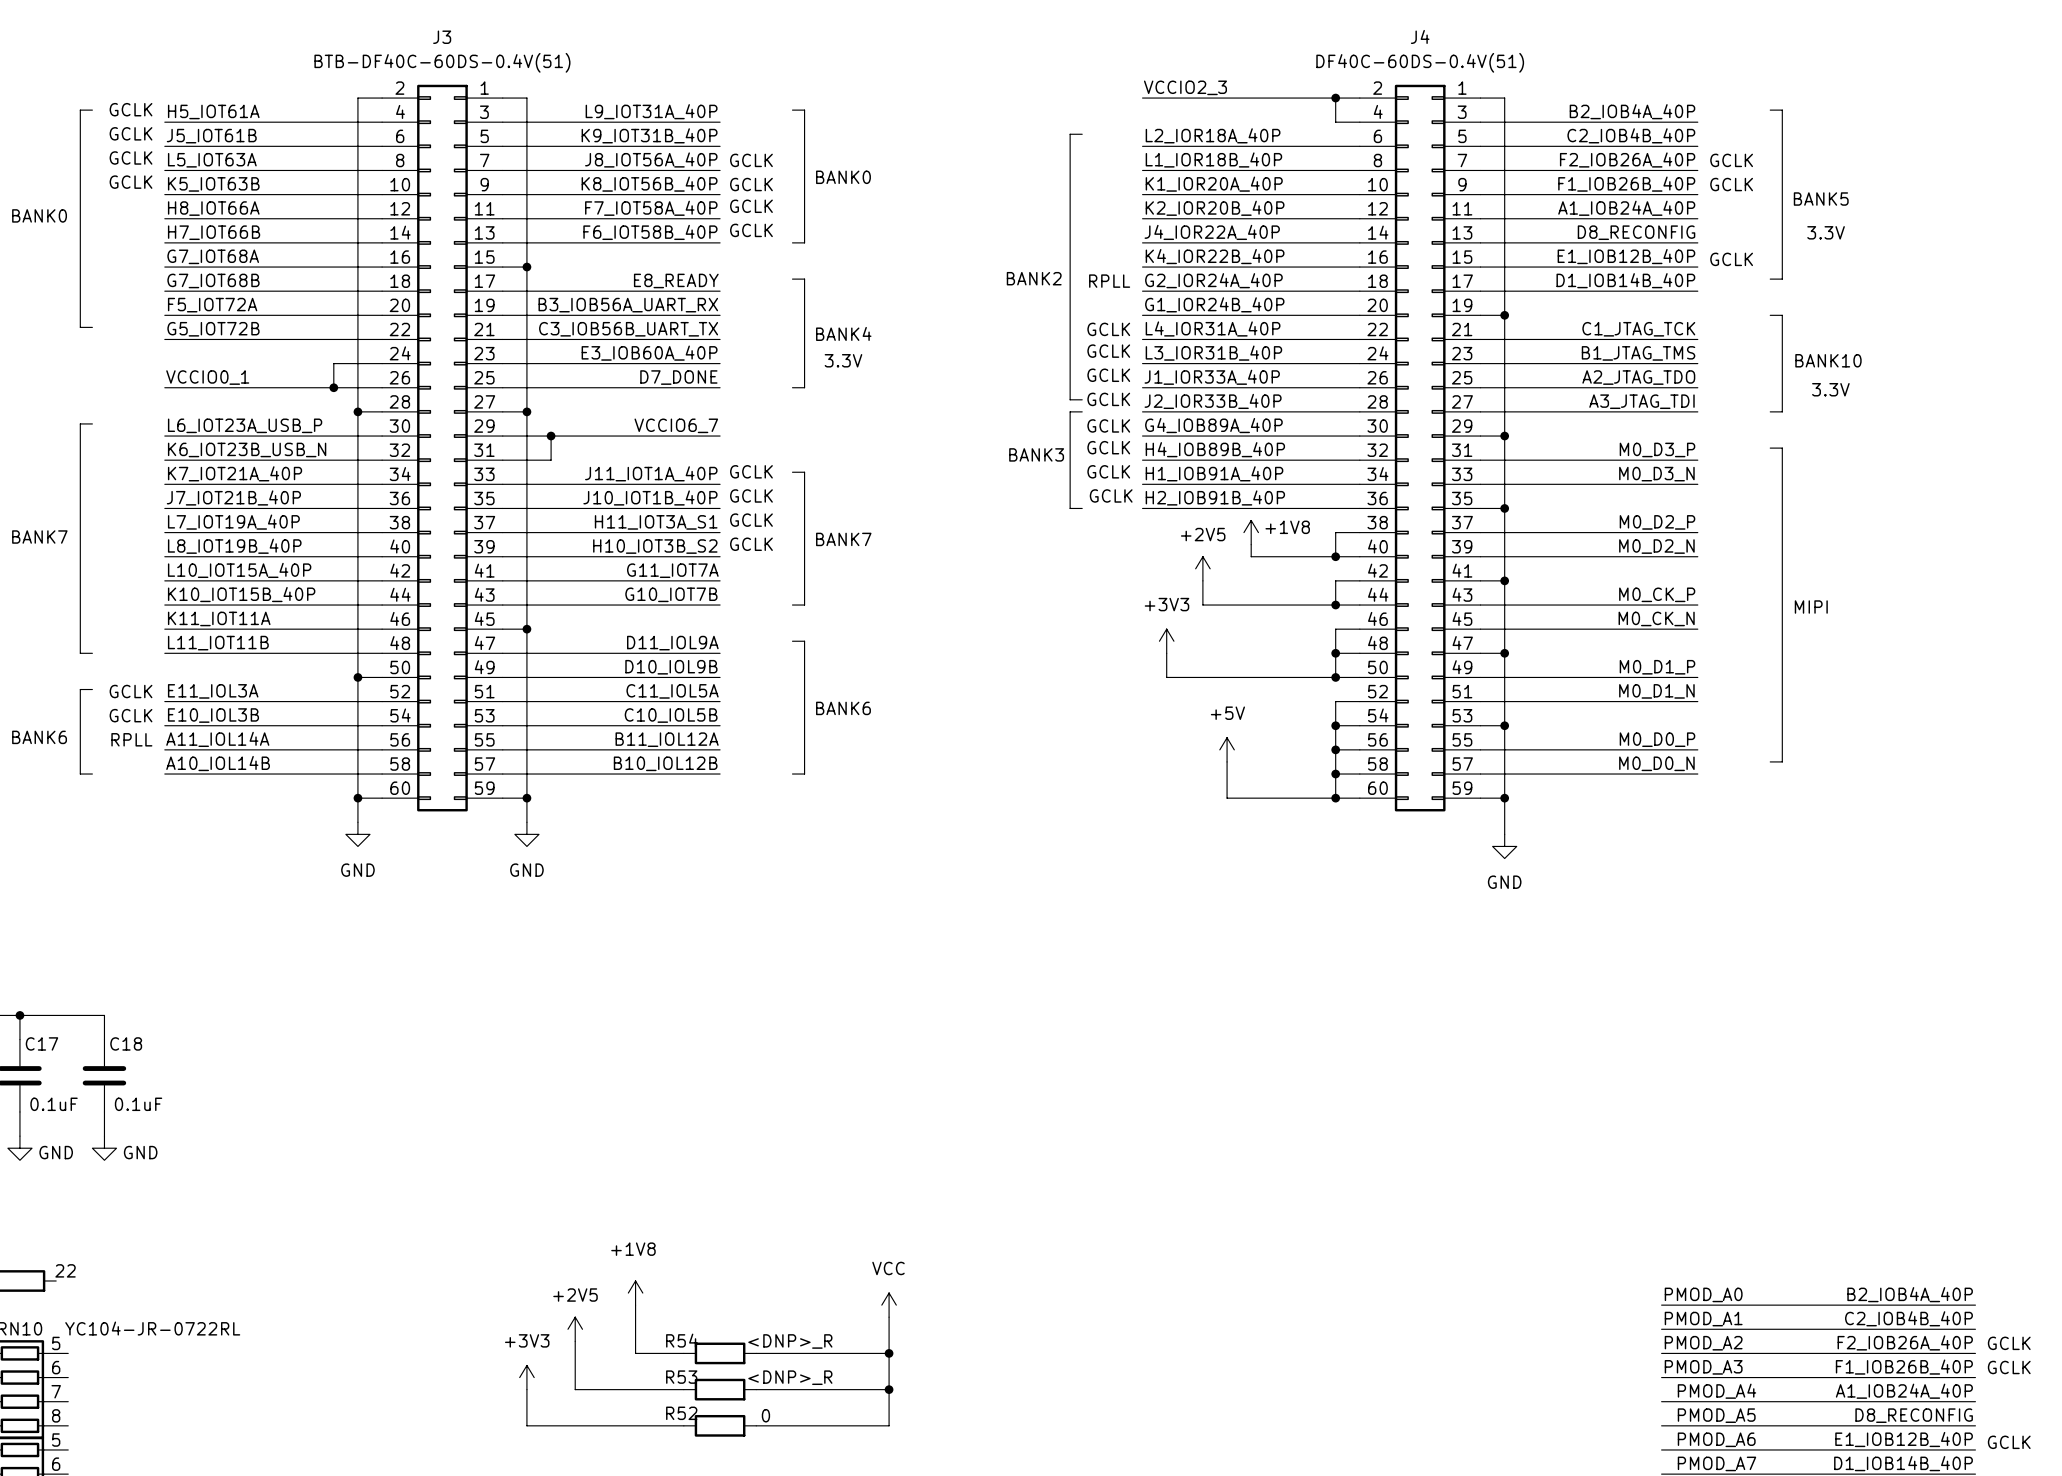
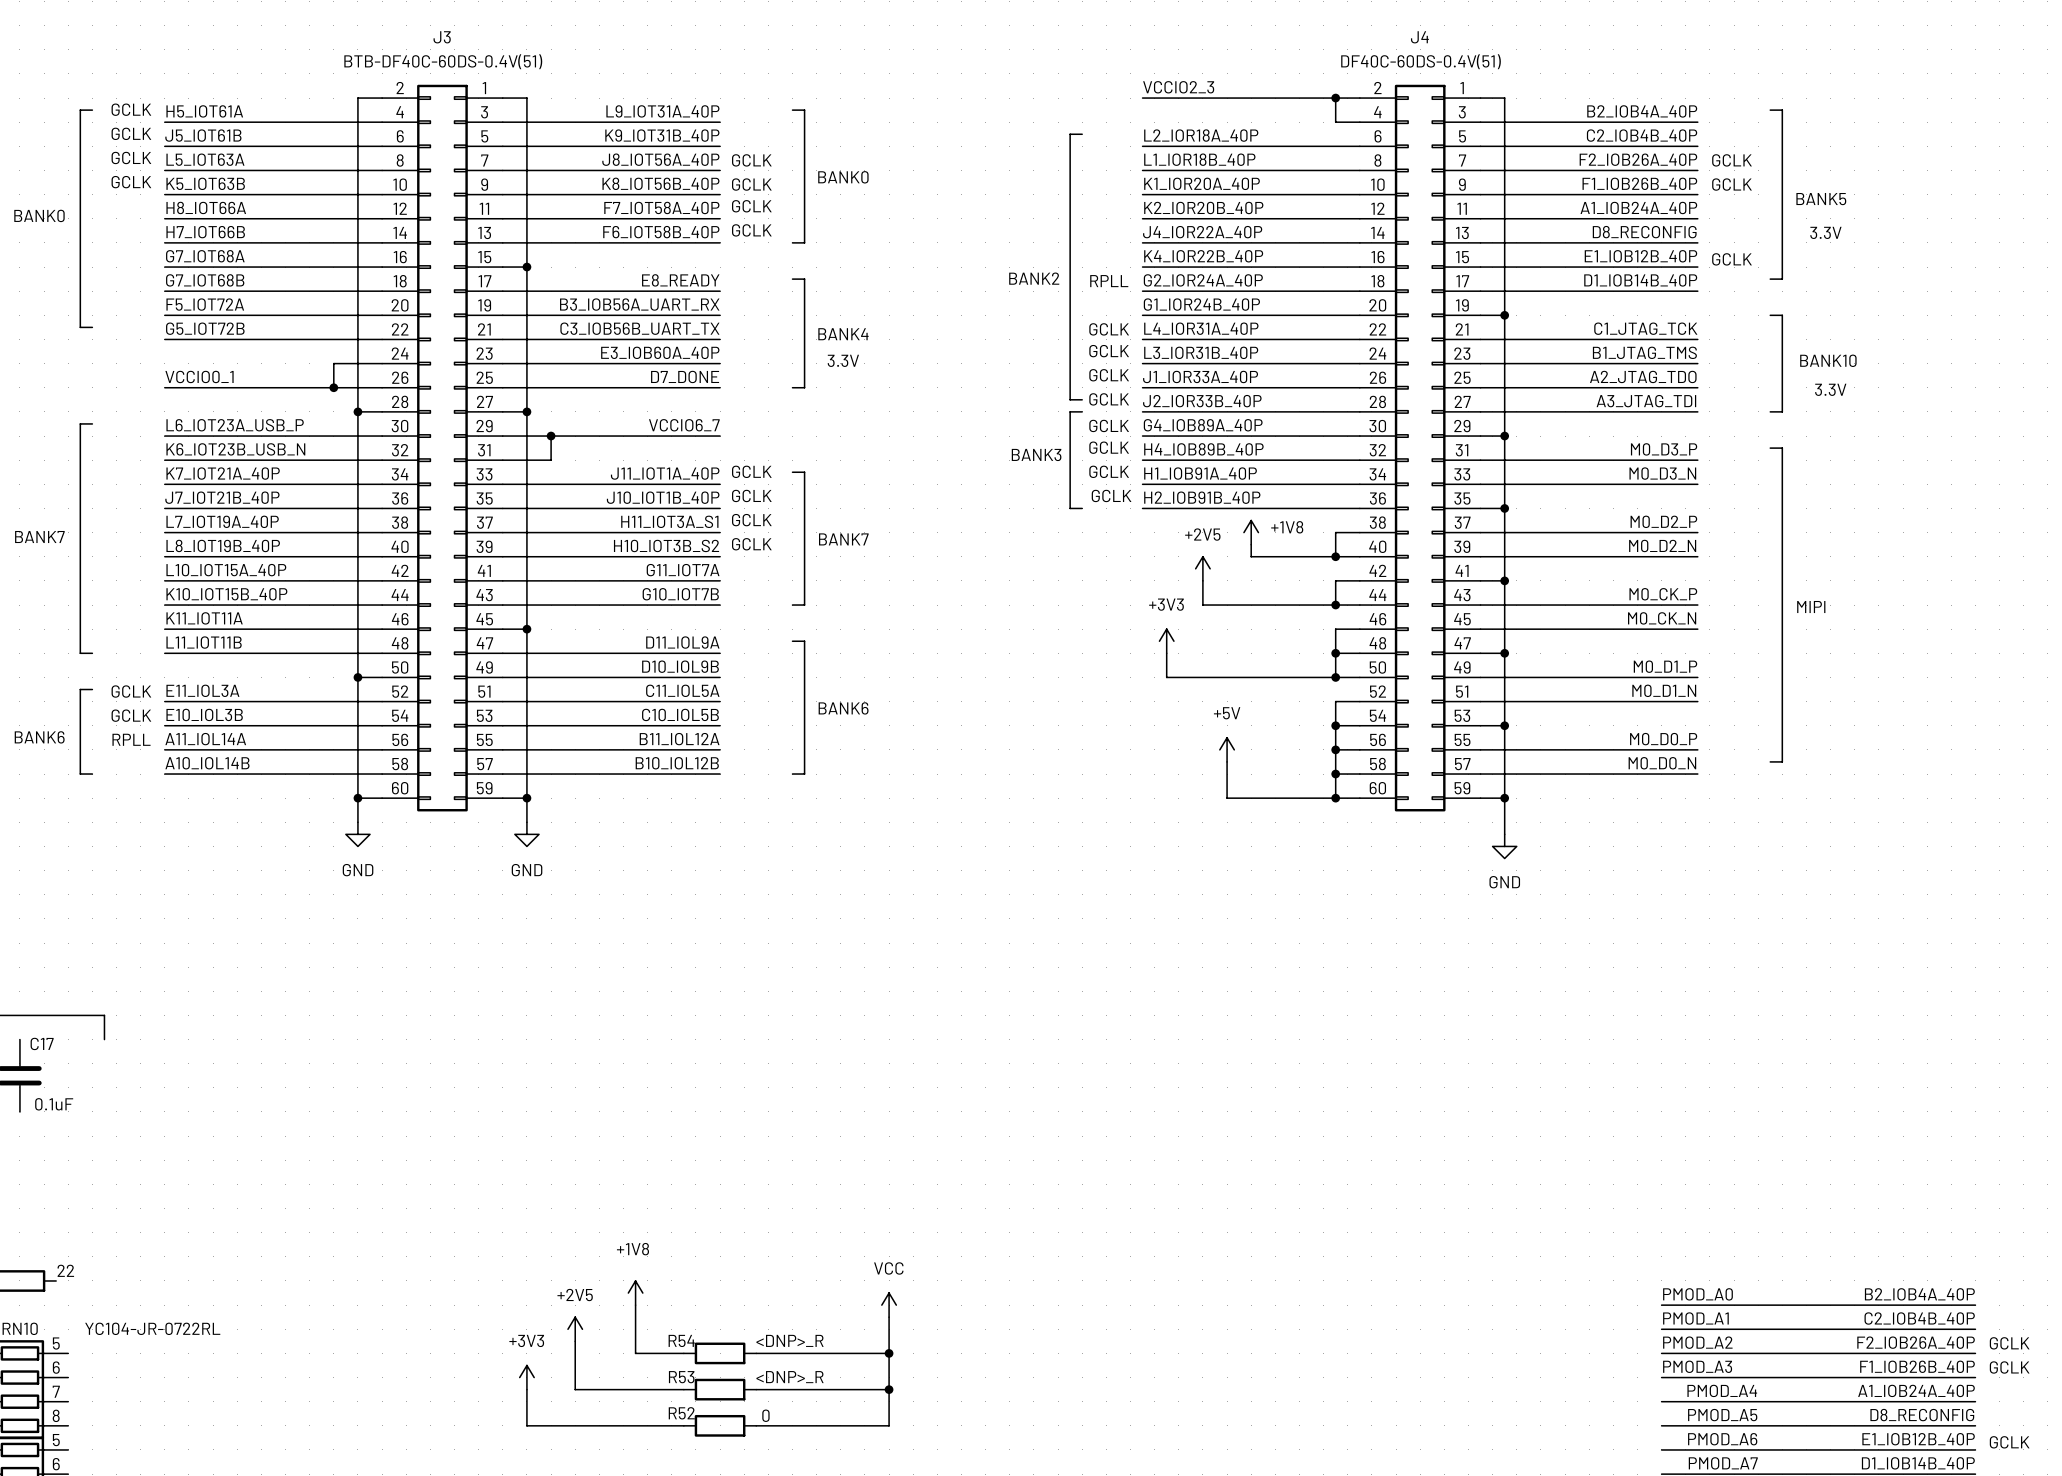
wire: (19, 1015) (19, 1039) -> none
junction: (19, 1015) -> none
C18: 0.1uF (104, 1075) -> none
wire: (19, 1111) (19, 1136) -> none
wire: (104, 1111) (104, 1136) -> none
power symbol: GND (19, 1148) -> none
power symbol: GND (104, 1148) -> none

